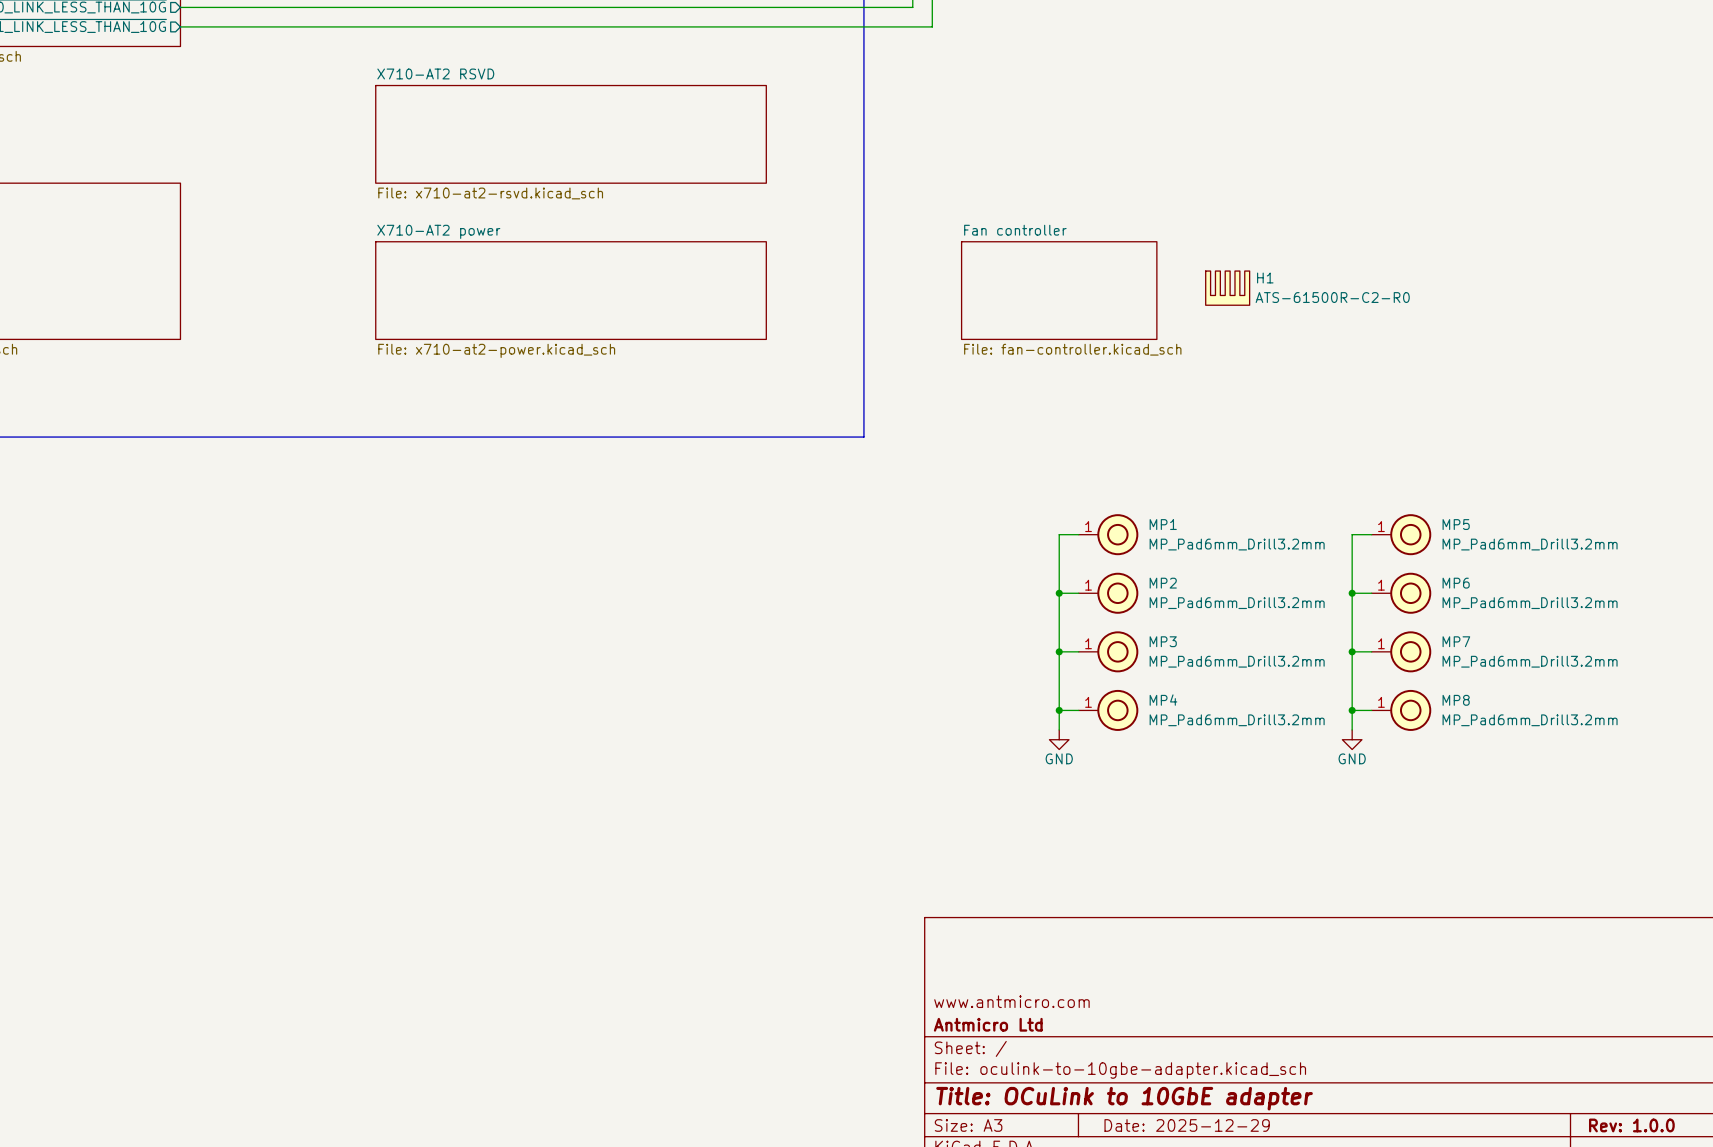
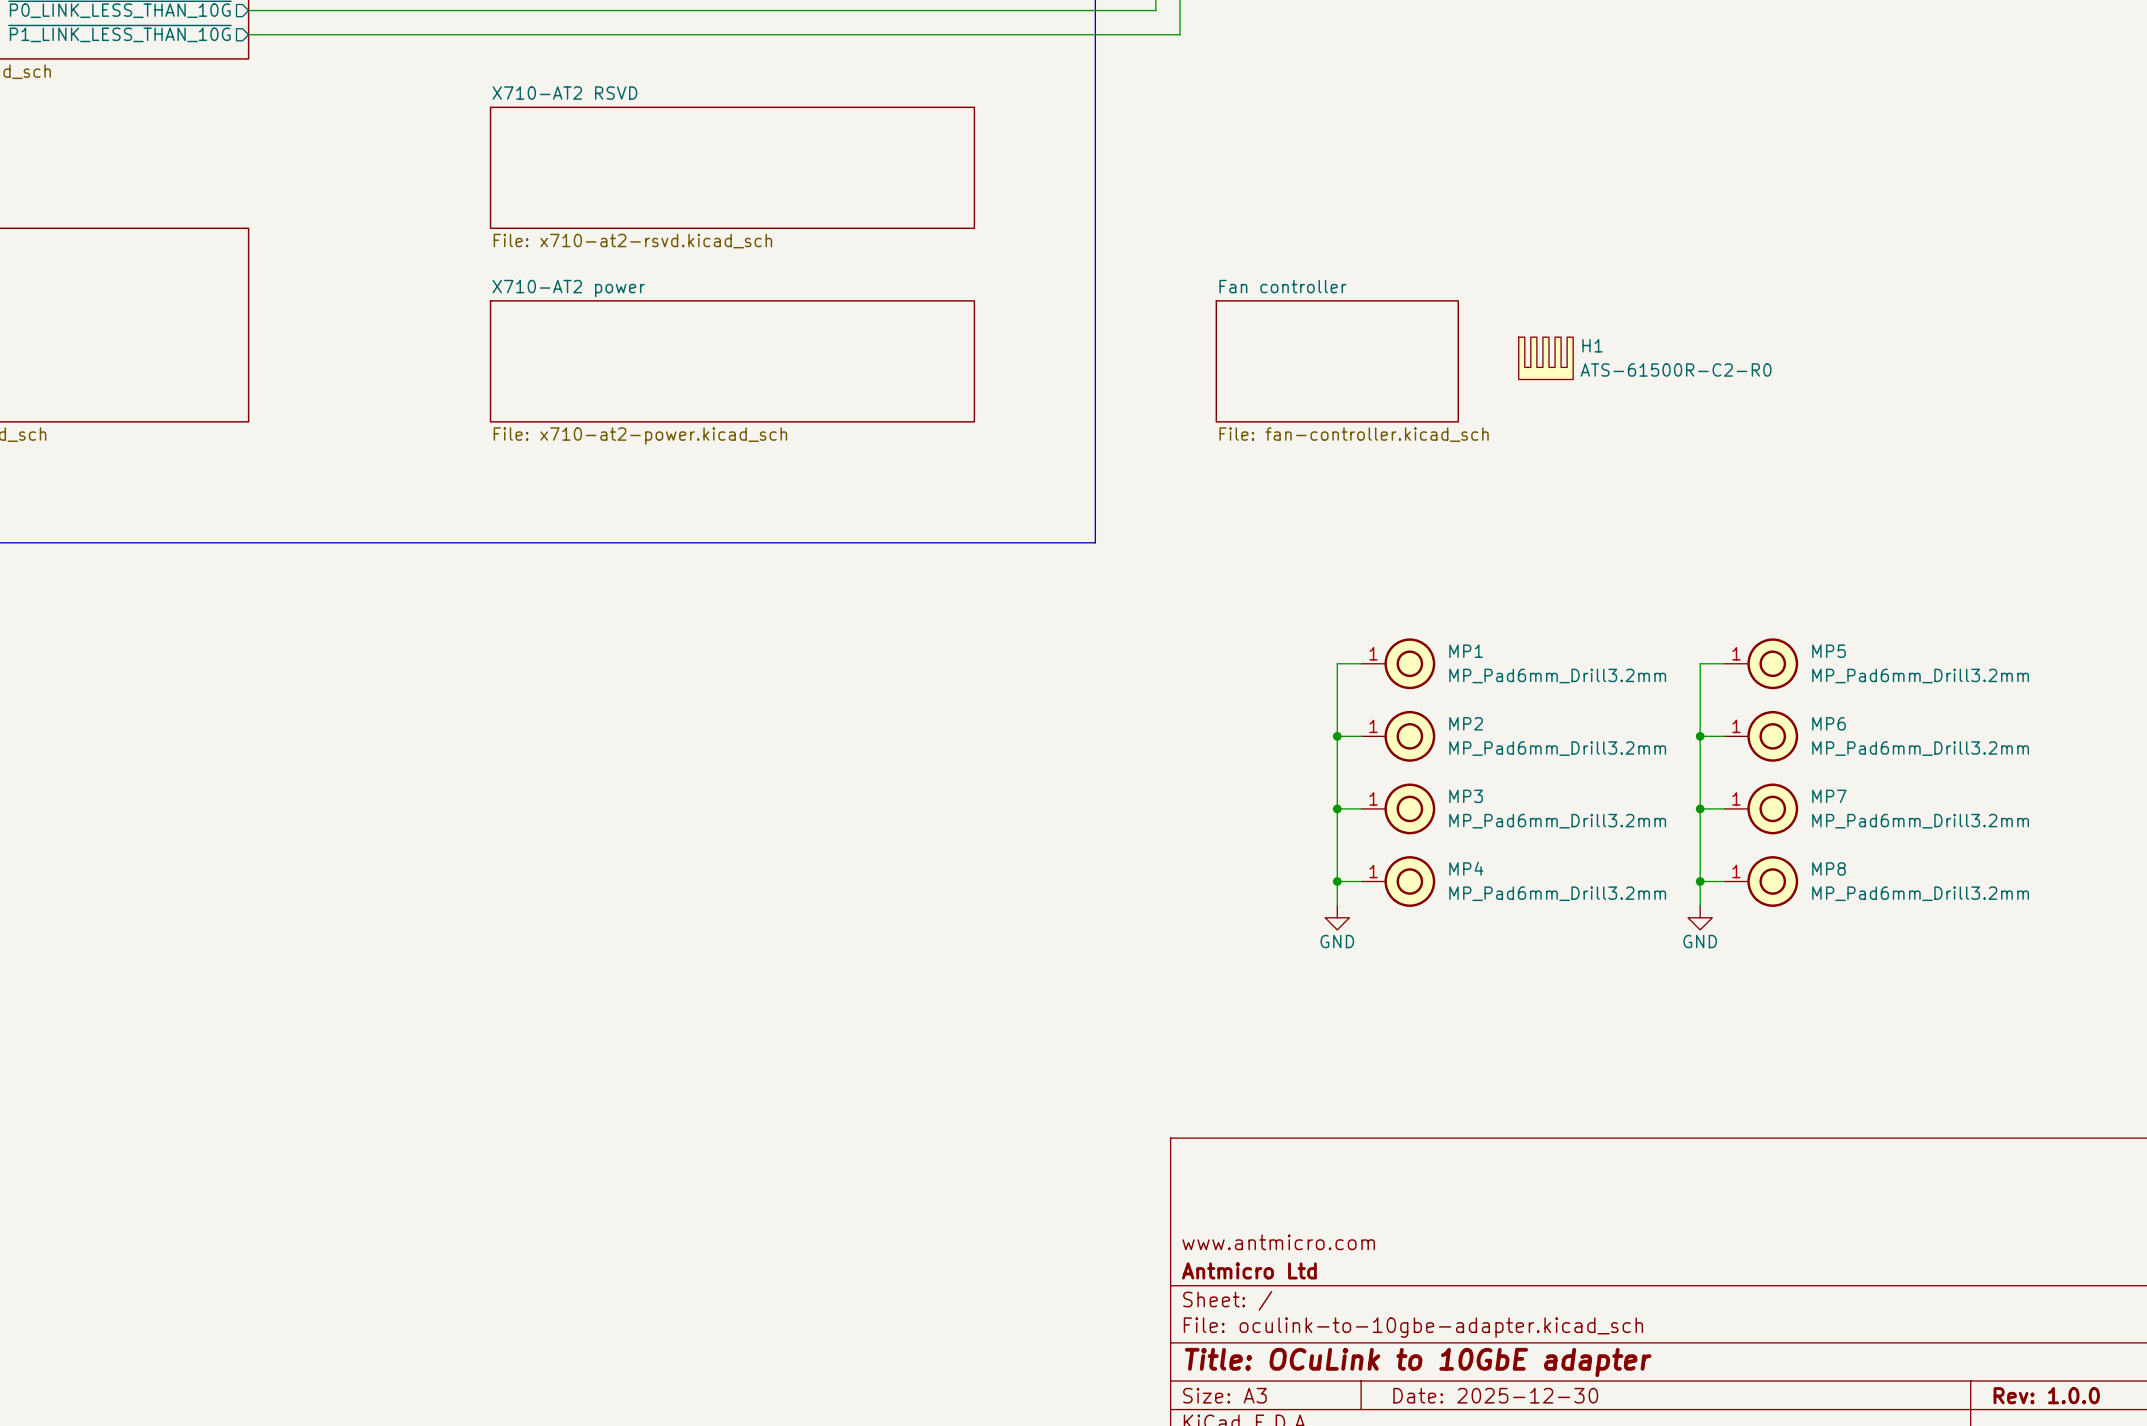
title block: Date: 2025-12-29 (1187, 1125) -> Date: 2025-12-30 (1495, 1395)

